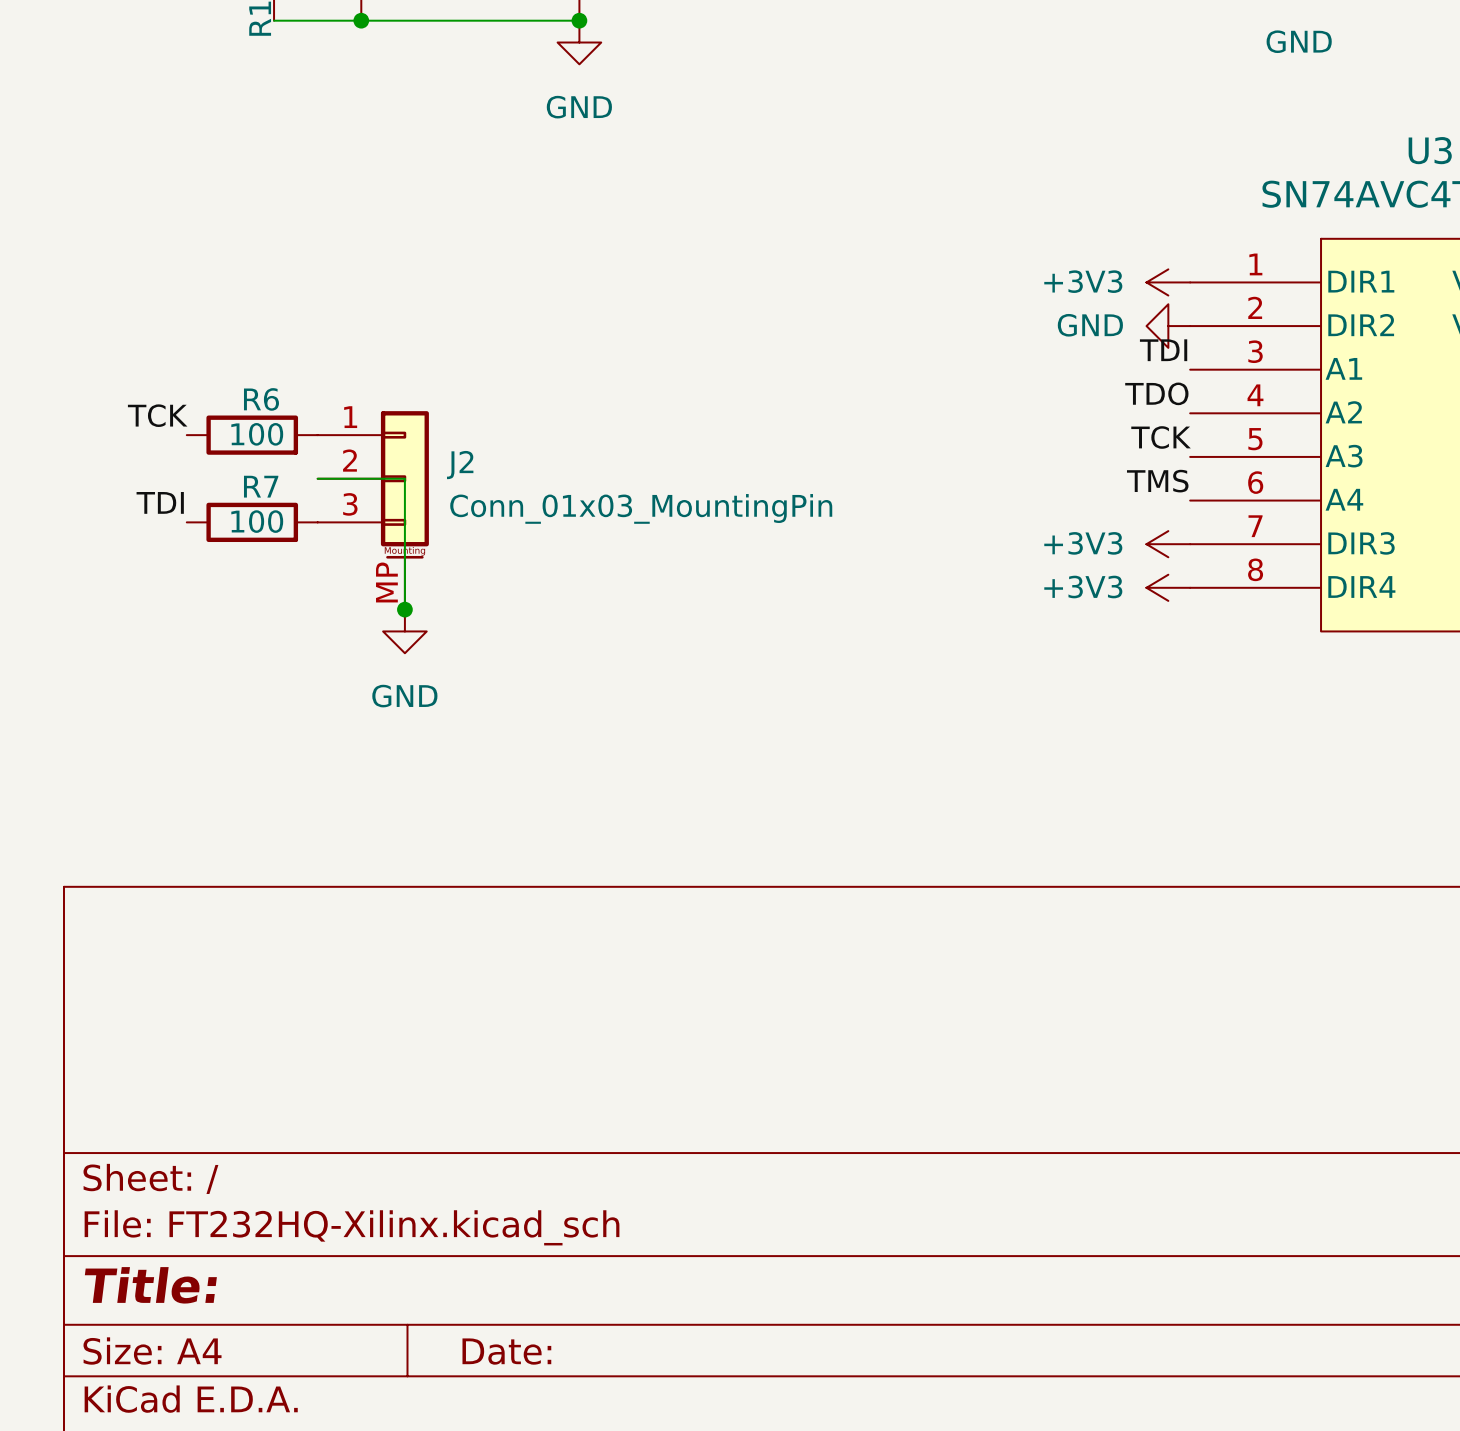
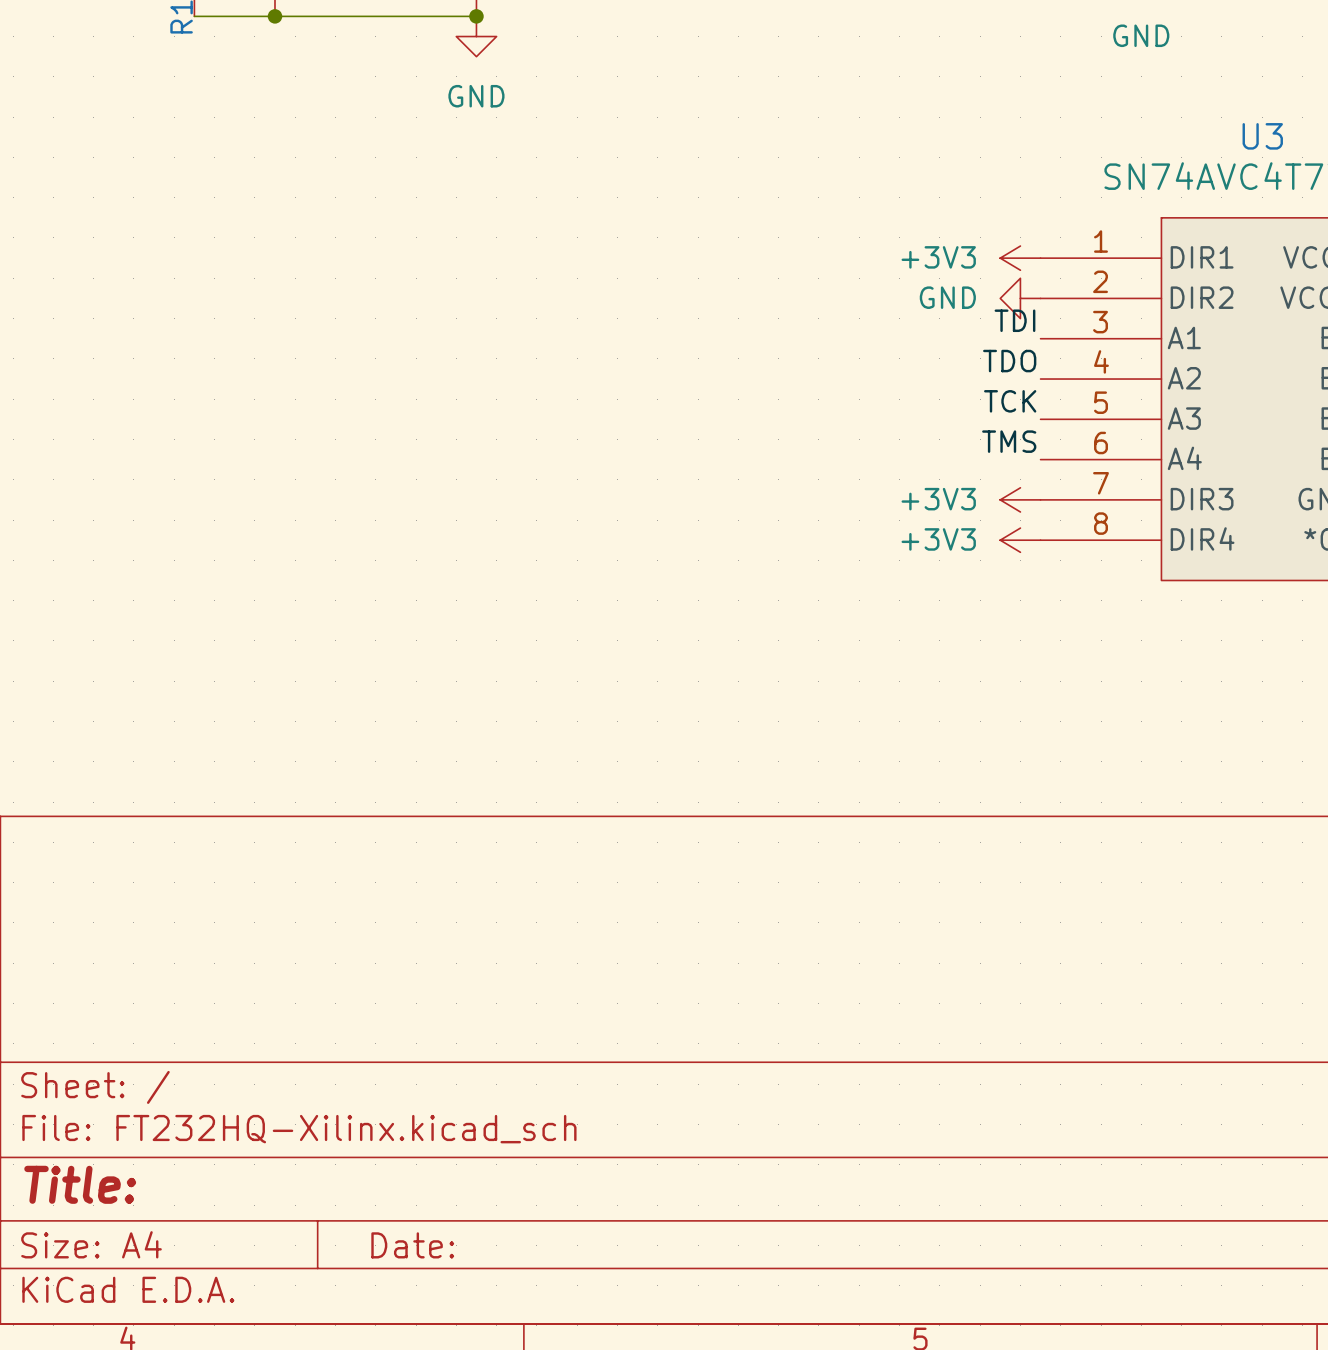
label: TCK (157, 415) -> none
R6: 100 (252, 435) -> none
wire: (317, 478) (404, 478) (404, 609) -> none
label: TDI (160, 502) -> none
J2: Conn_01x03_MountingPin (373, 510) -> none
R7: 100 (252, 522) -> none
junction: (404, 609) -> none
power symbol: GND (404, 631) -> none

